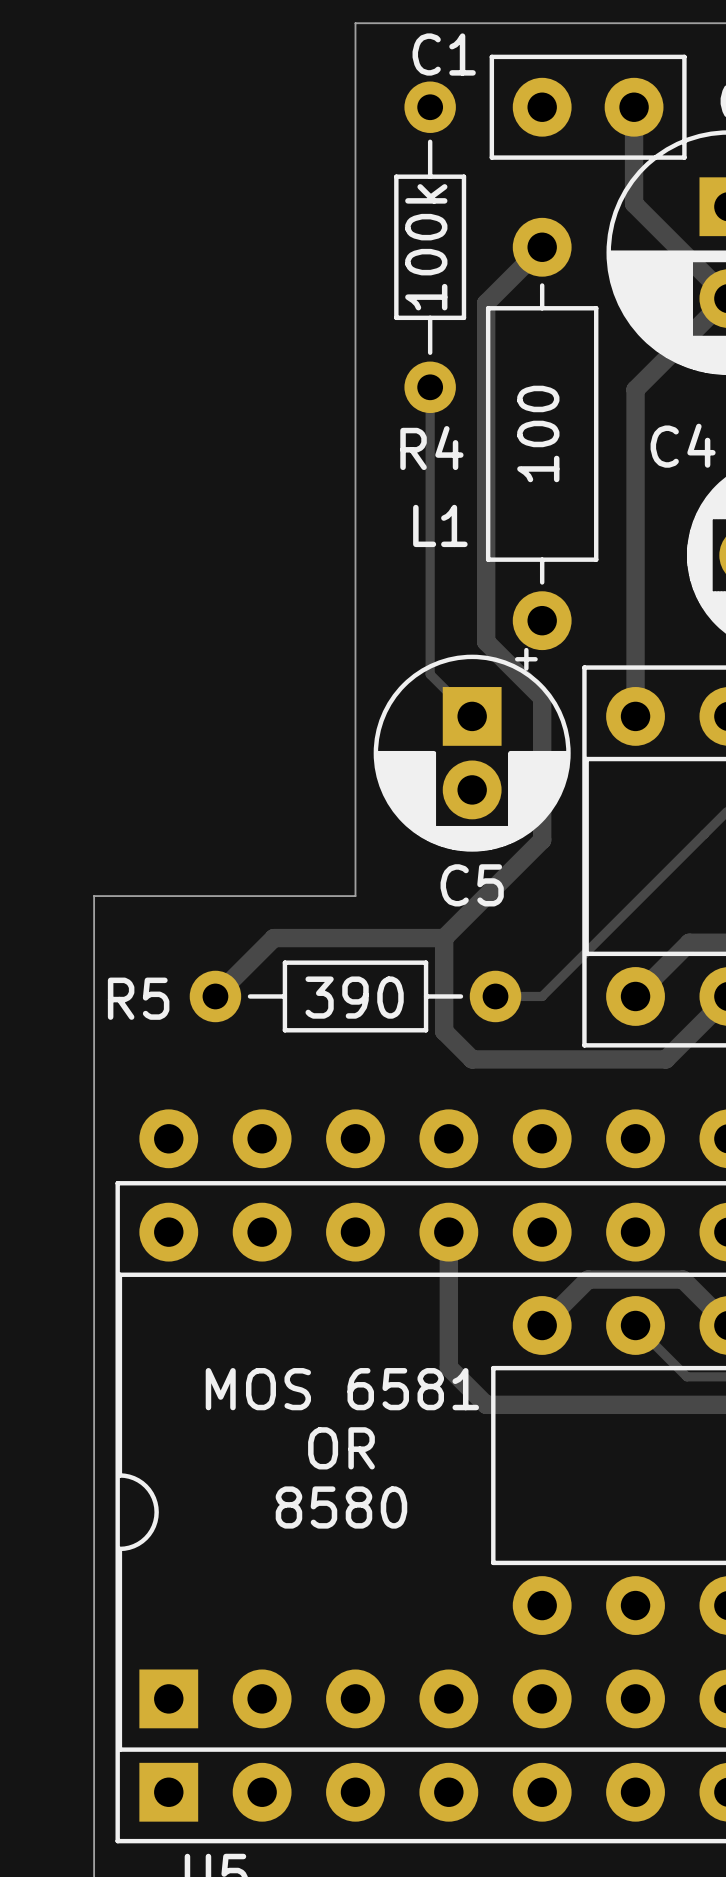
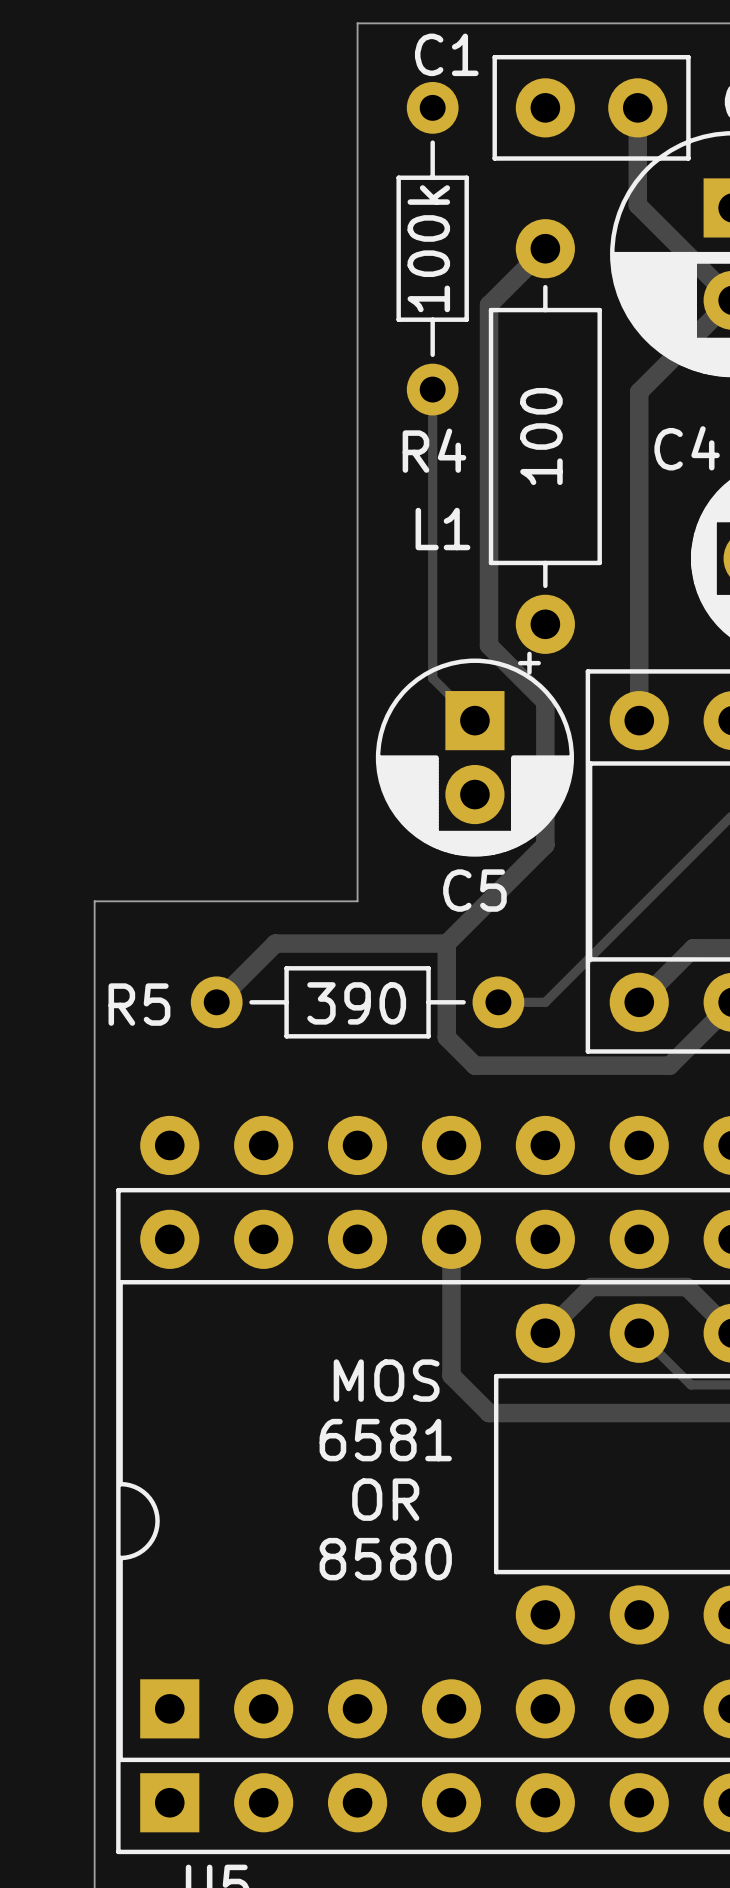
text: none -> MOS (386, 1380)
text: MOS 6581 (342, 1389) -> 6581 (385, 1440)
text position: OR (341, 1448) -> OR (385, 1499)
text position: 8580 (341, 1507) -> 8580 (385, 1559)

